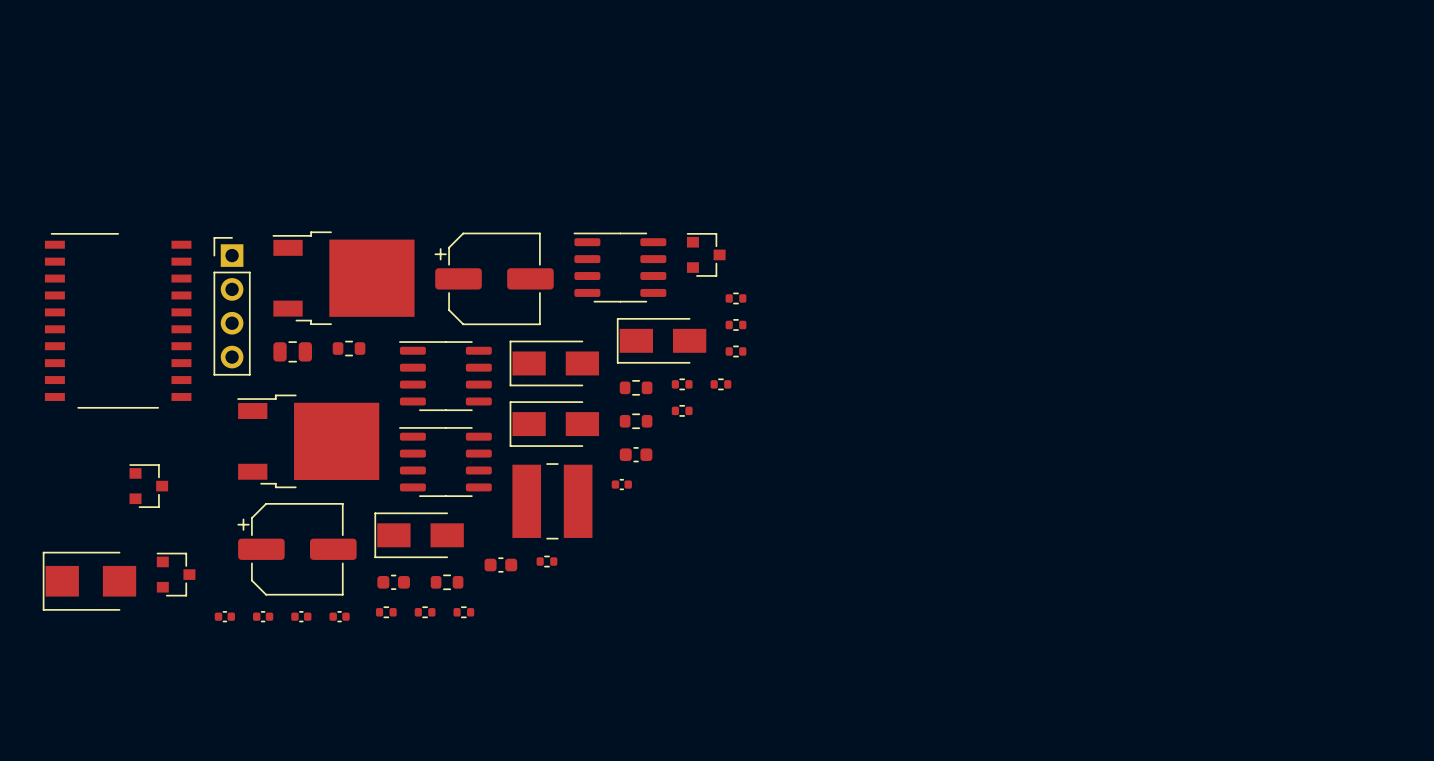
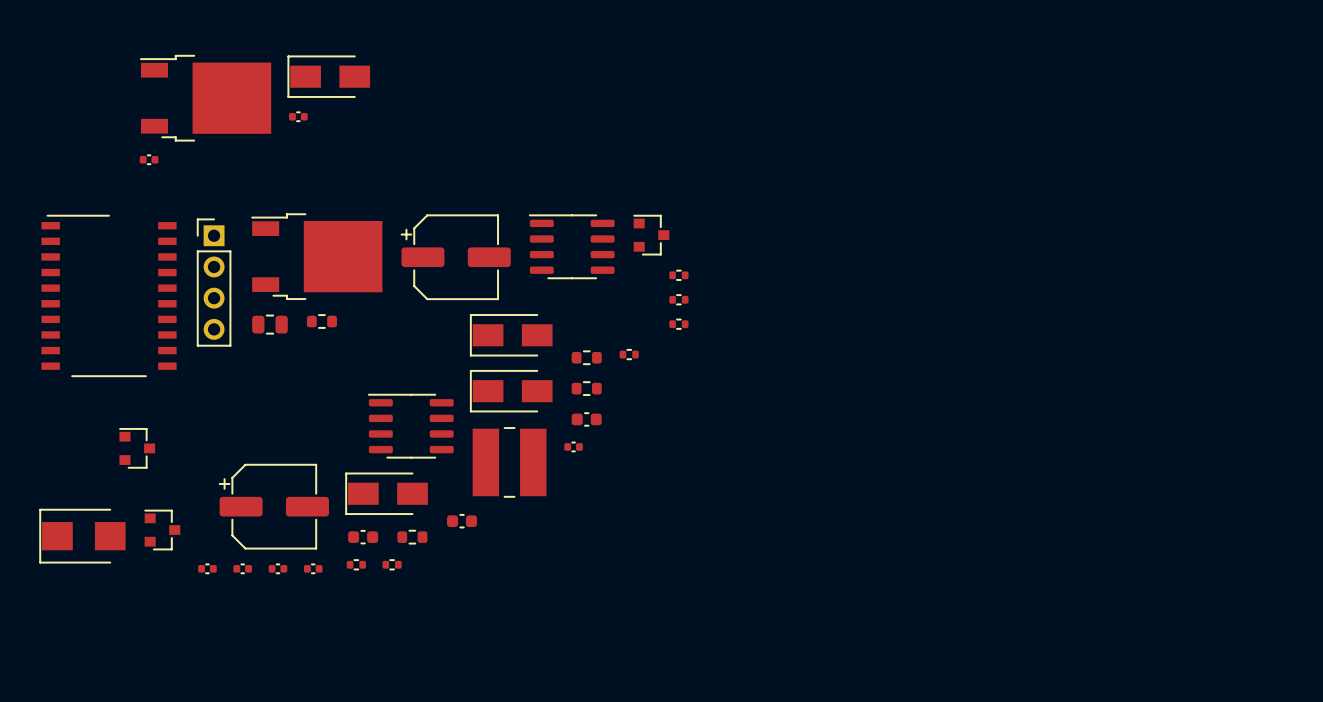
part: none -> (328, 76)
part: none -> (205, 98)
part: none -> (298, 116)
part: none -> (149, 159)
part: (661, 340) -> none
part: (445, 376) -> none
part: (720, 384) -> none
part: (682, 410) -> none
part: (308, 441) -> none
part: (546, 561) -> none
part: (463, 612) -> none

